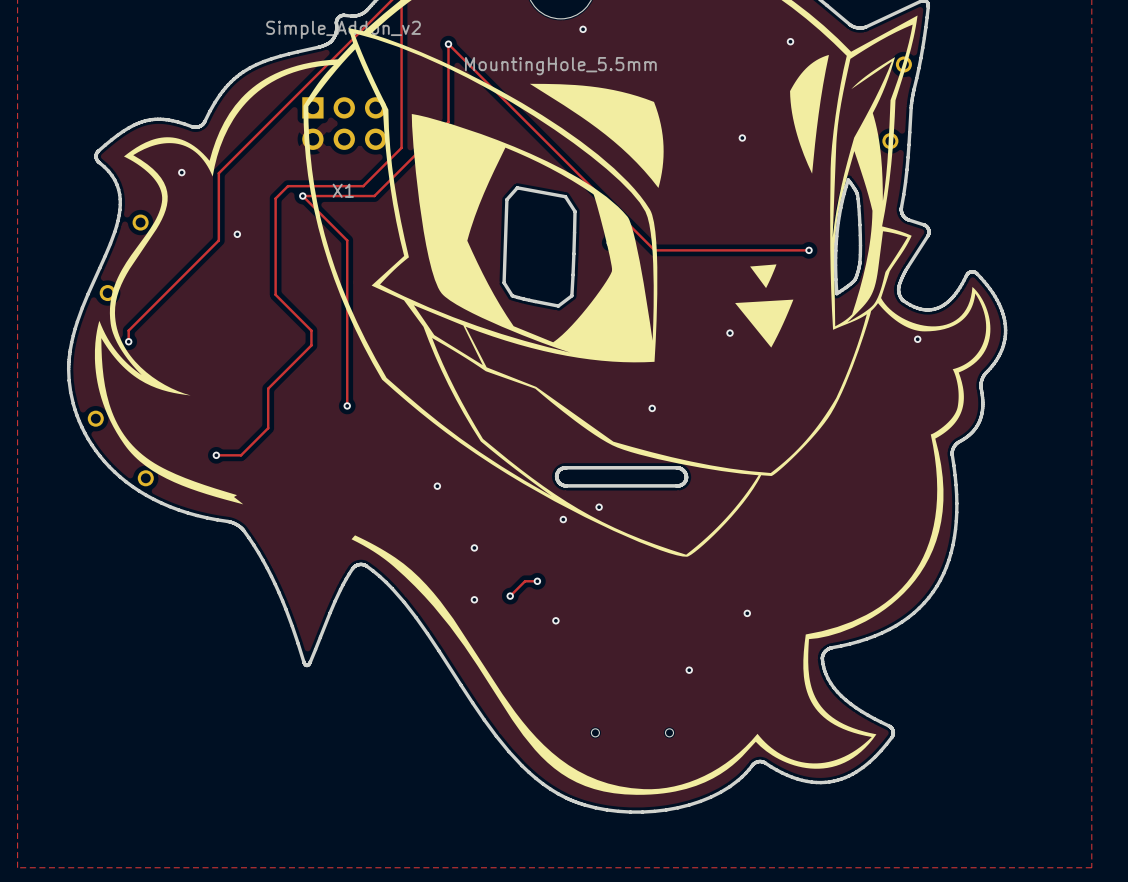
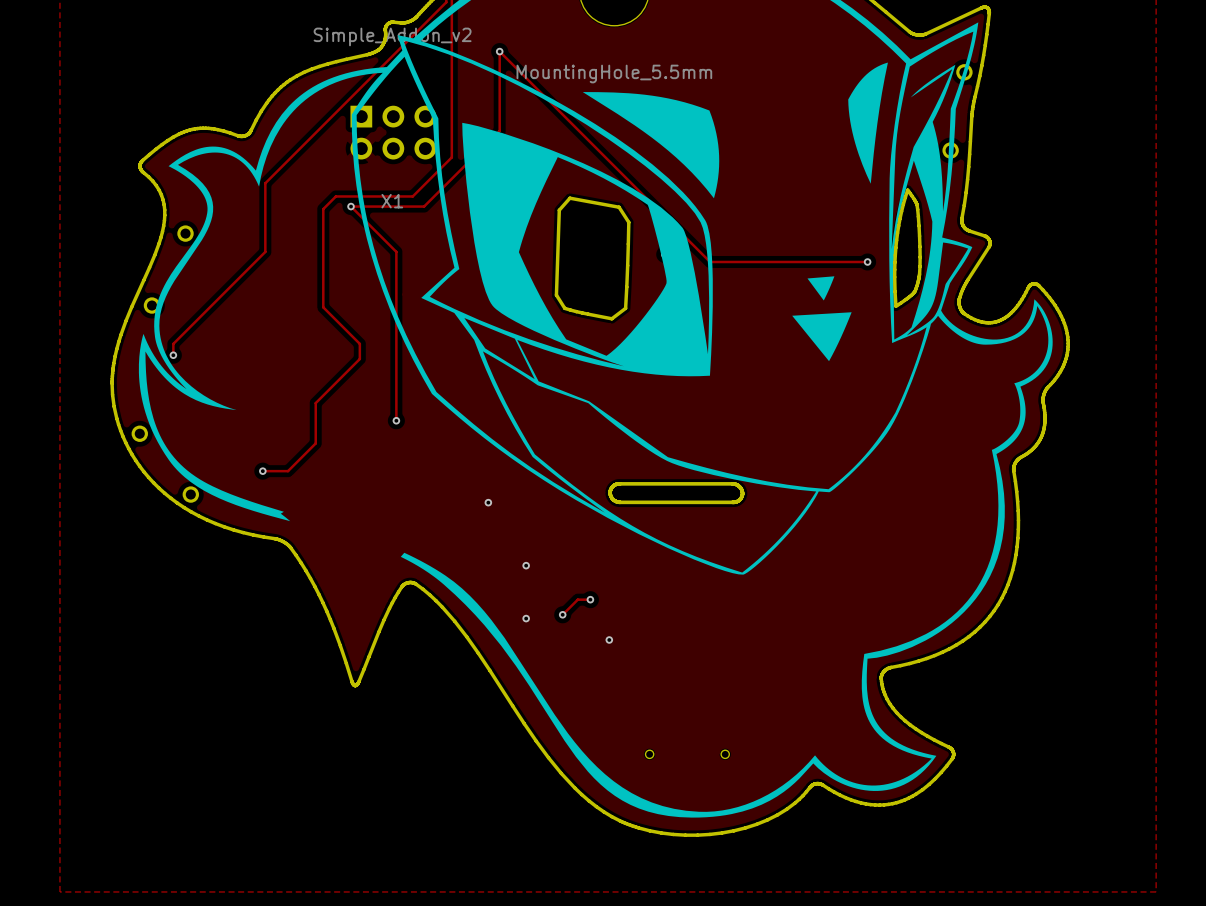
via: (583, 29) -> none
via: (790, 41) -> none
via: (742, 138) -> none
via: (181, 172) -> none
via: (237, 234) -> none
via: (730, 333) -> none
via: (917, 339) -> none
via: (652, 408) -> none
via: (599, 507) -> none
via: (563, 519) -> none
via: (747, 613) -> none
via: (689, 670) -> none

